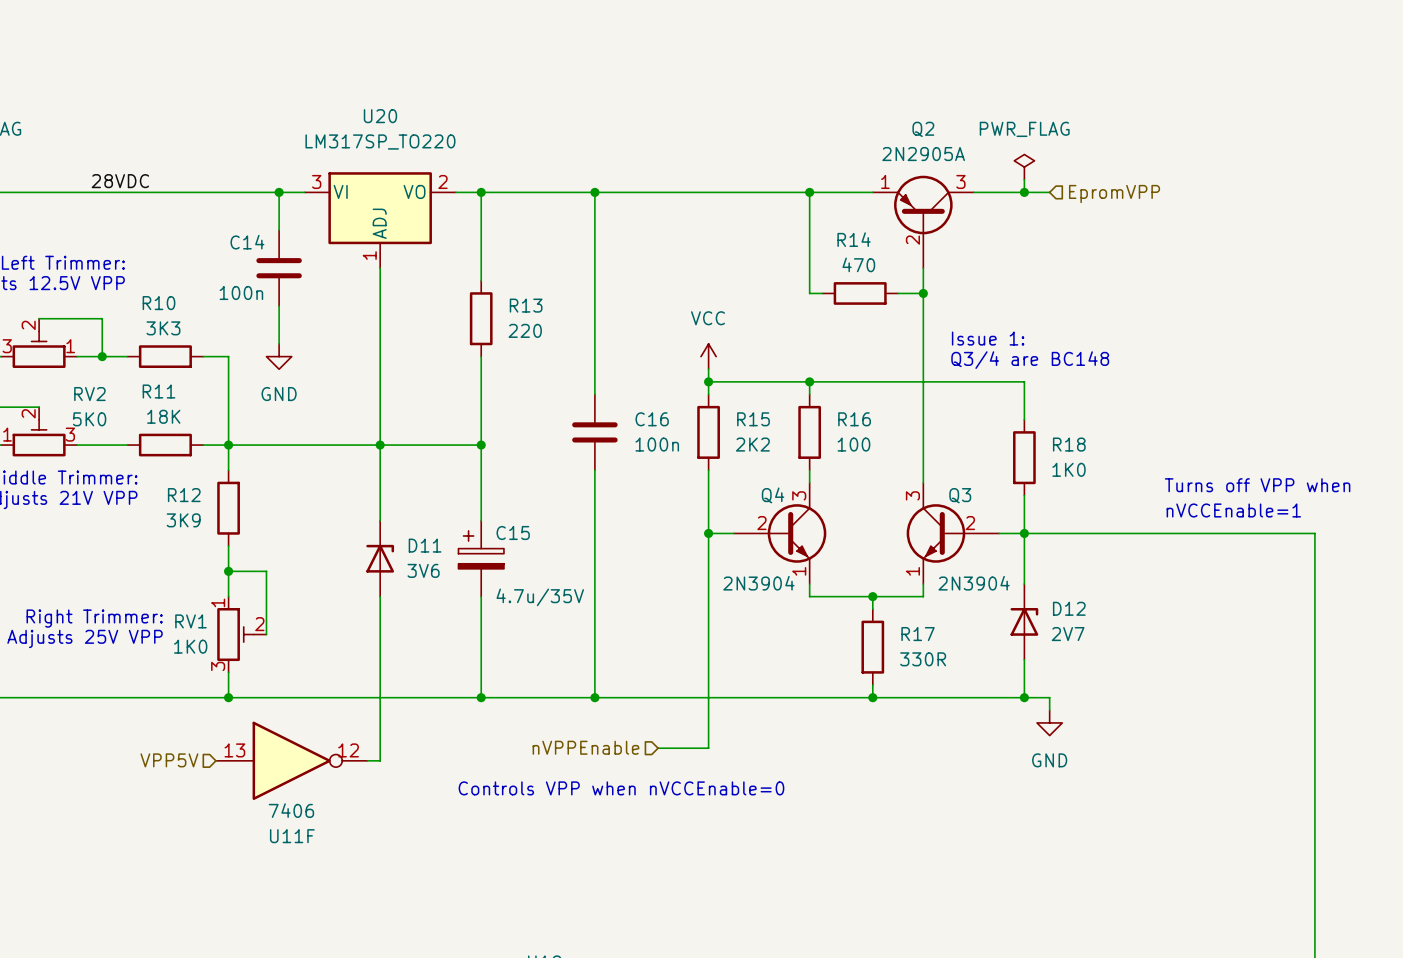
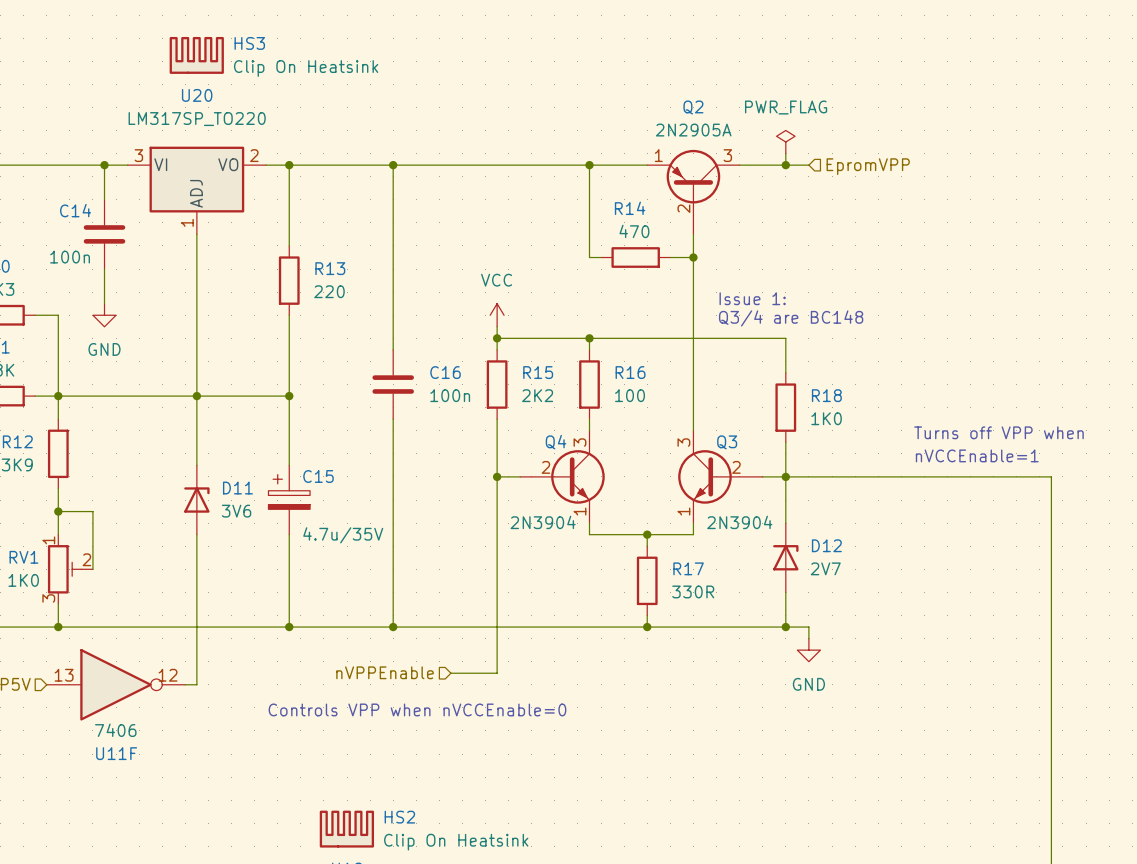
HS3: none -> Clip On Heatsink (196, 55)
HS2: none -> Clip On Heatsink (346, 829)

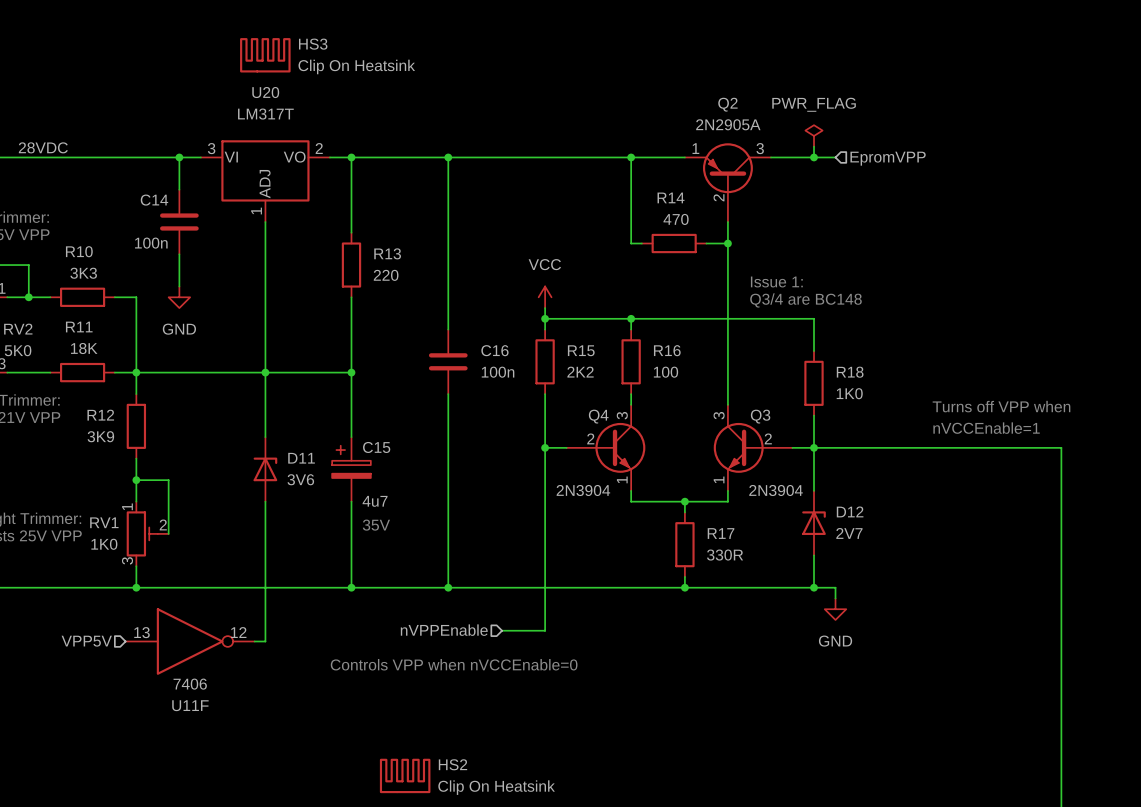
U20 value: LM317SP_TO220 (197, 119) -> LM317T (265, 114)
C15 value: 4.7u/35V (343, 535) -> 4u7 (375, 501)
text: none -> 35V (376, 525)

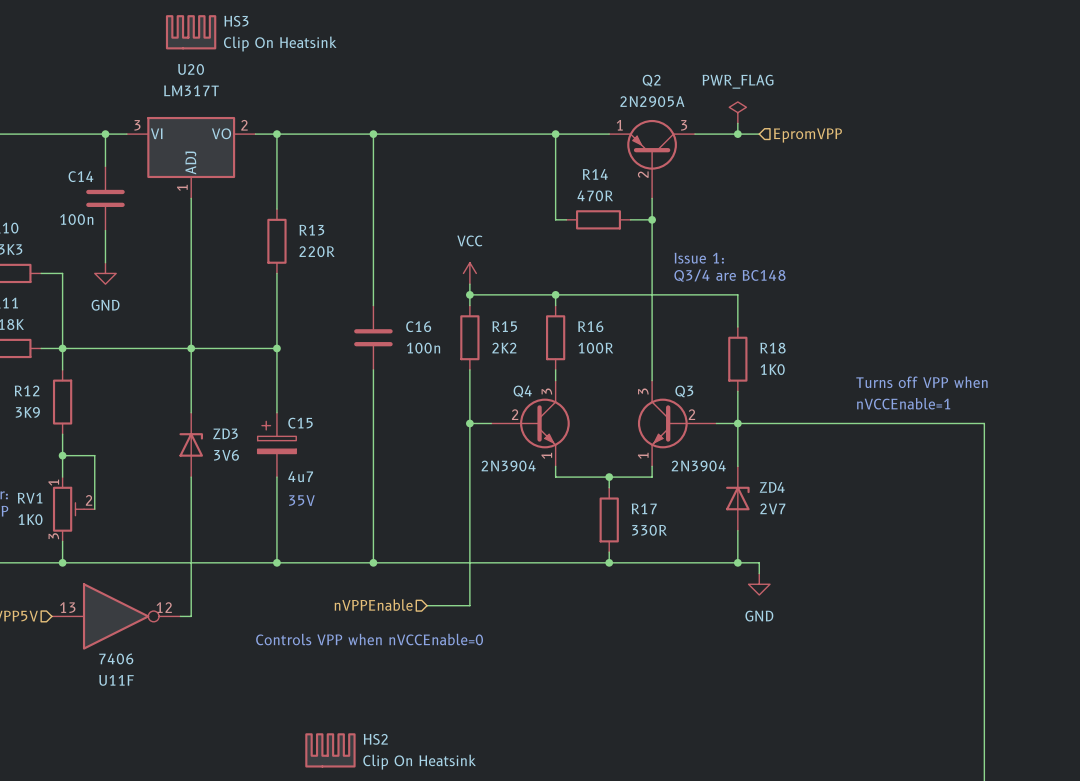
R14 value: 470 (676, 219) -> 470R (595, 195)
R13 value: 220 (386, 275) -> 220R (317, 251)
R16 value: 100 (665, 372) -> 100R (595, 348)
D11 name: D11 (301, 458) -> ZD3 (225, 433)
D12 name: D12 (850, 511) -> ZD4 (772, 487)

